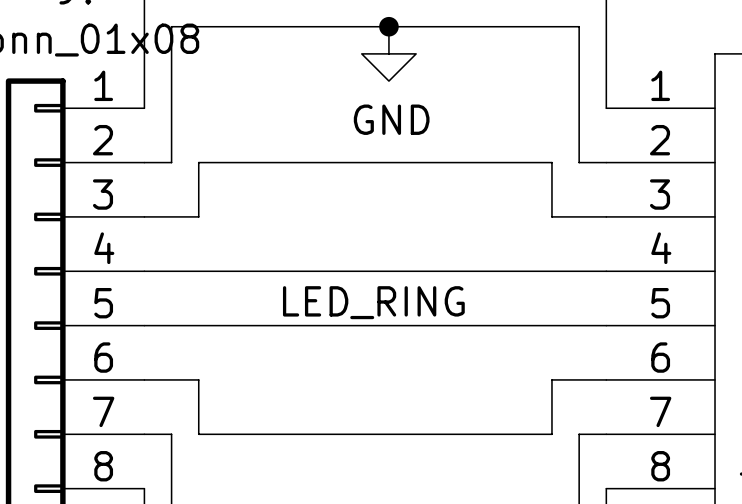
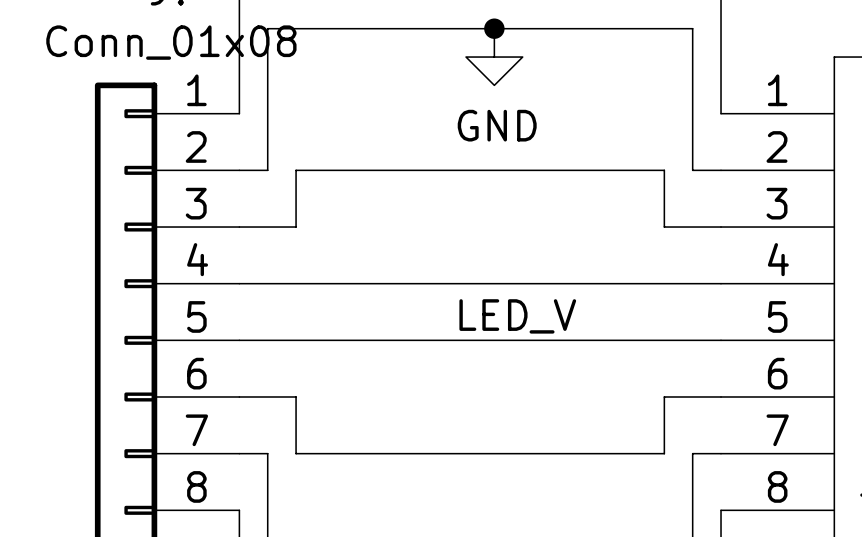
label: LED_RING (373, 302) -> LED_V (517, 316)

